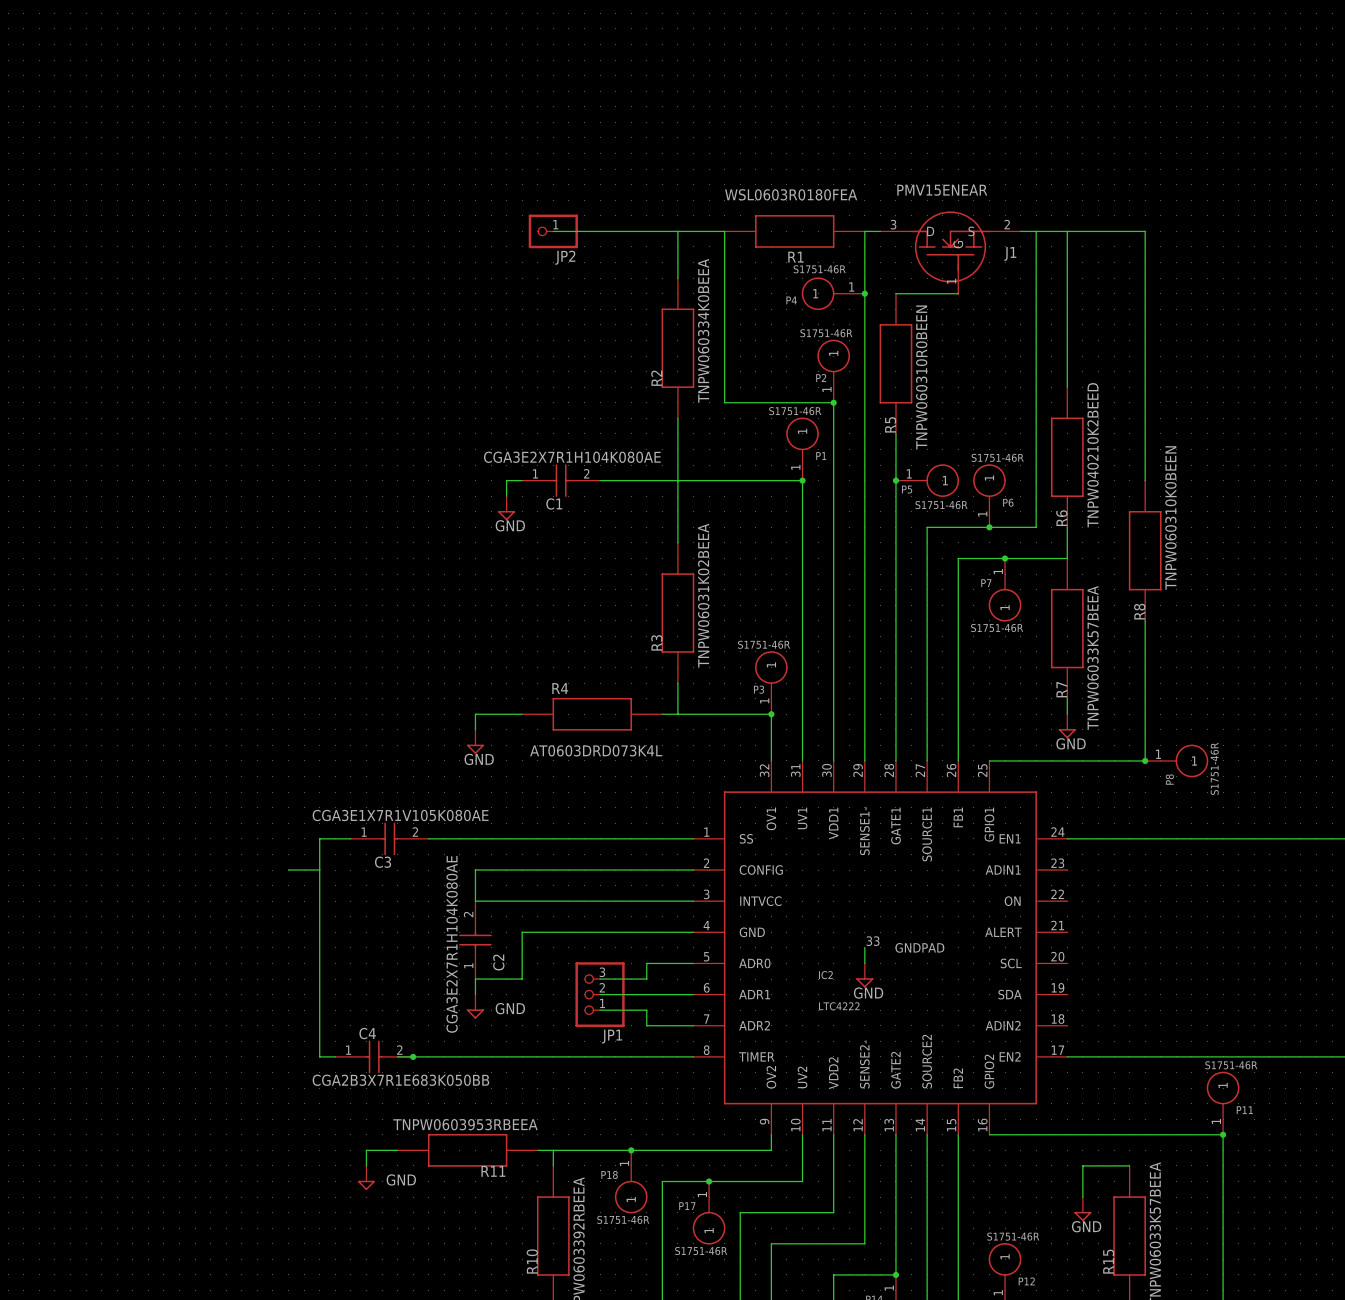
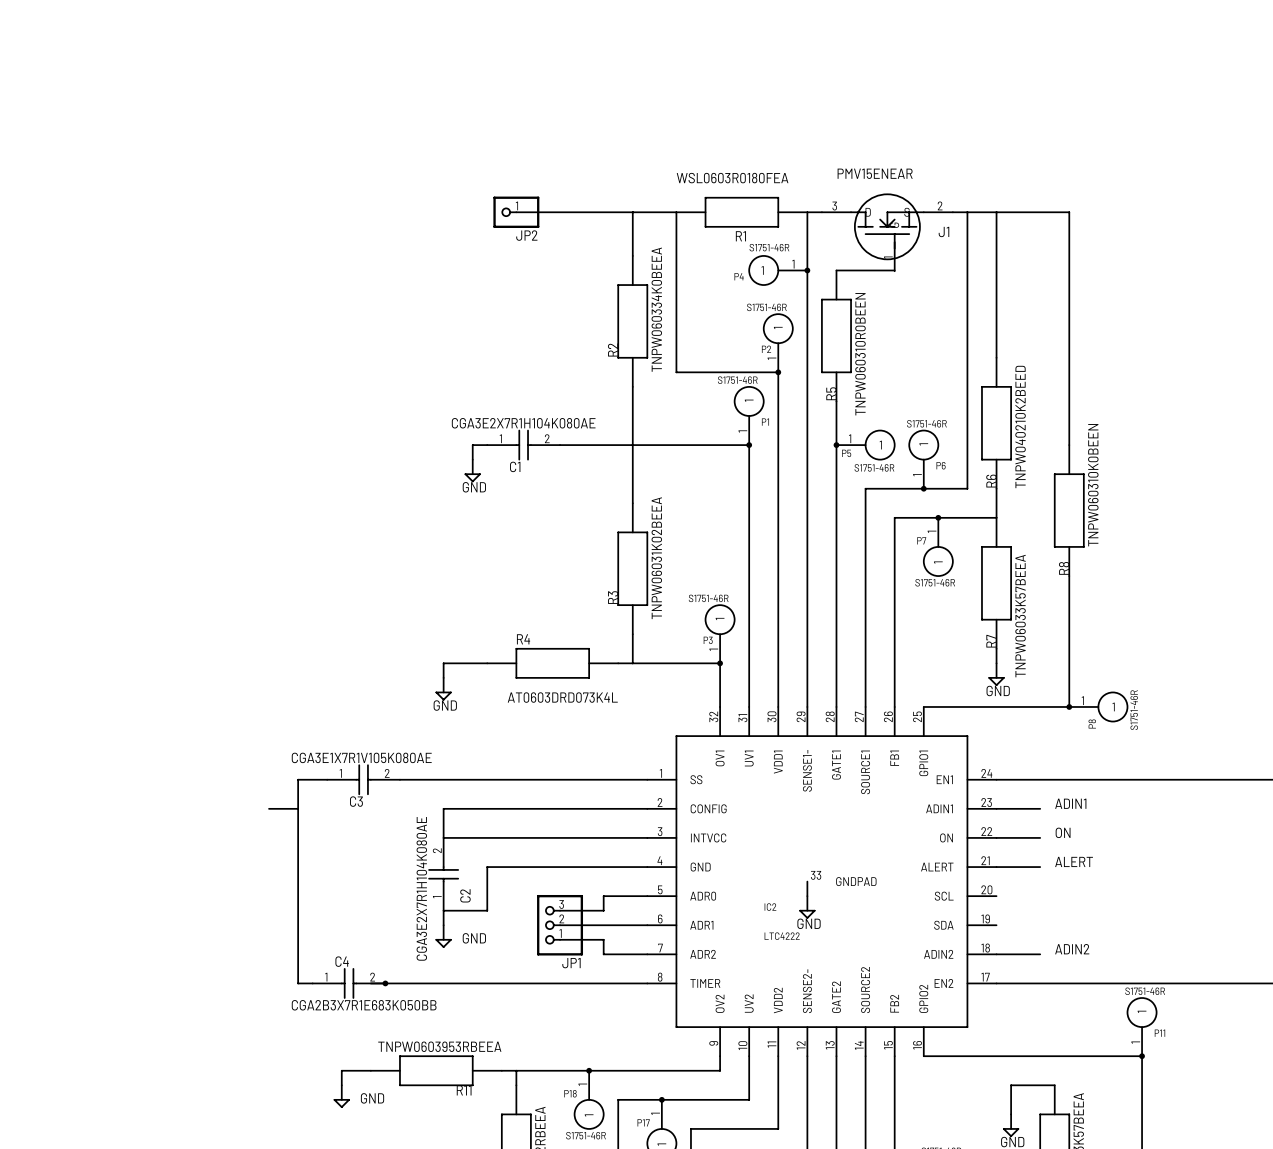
label: none -> ADIN1 (1070, 803)
wire: none -> (996, 808) (1040, 808)
label: none -> ON (1063, 832)
wire: none -> (996, 837) (1040, 837)
label: none -> ALERT (1074, 861)
wire: none -> (996, 867) (1040, 867)
label: none -> ADIN2 (1072, 949)
wire: none -> (996, 954) (1040, 954)

